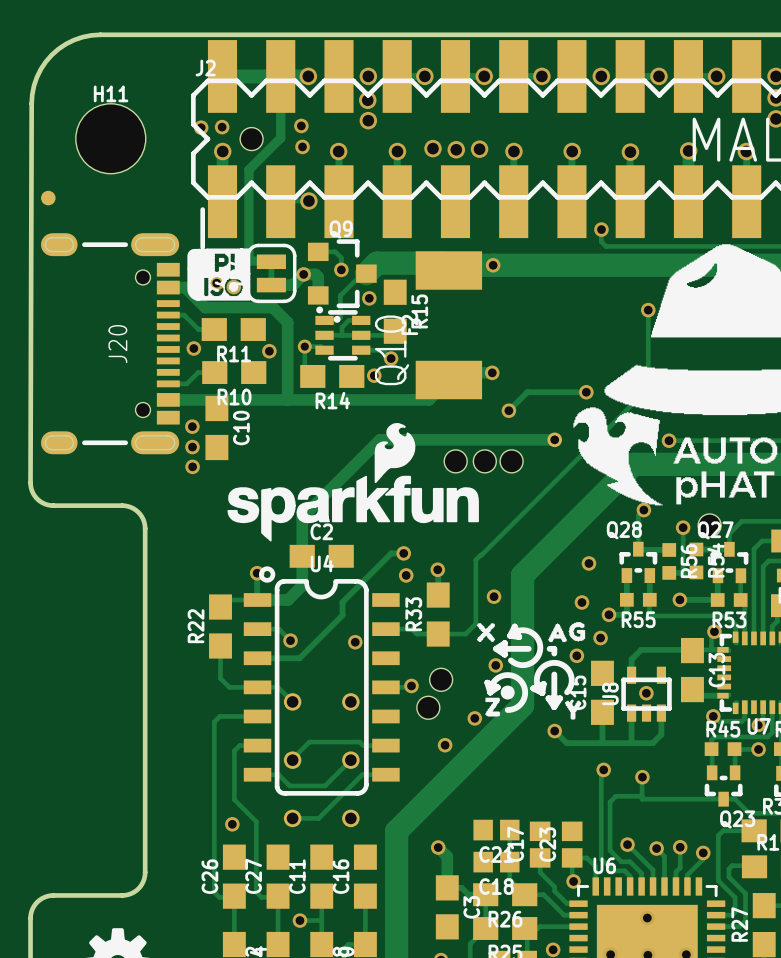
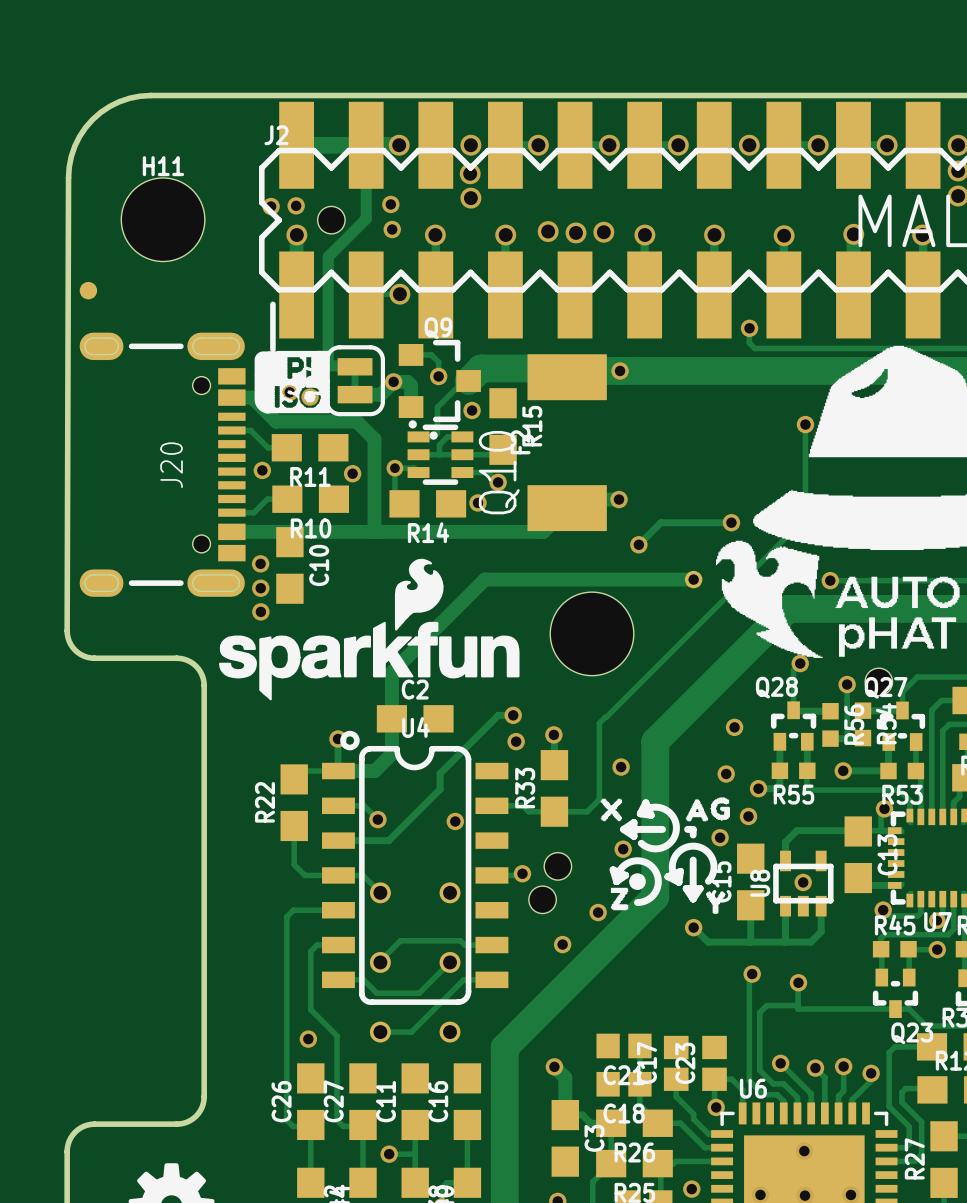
hole: (455, 461) -> none
hole: (484, 461) -> none
hole: (511, 461) -> none
drawing position: (353, 482) -> (369, 629)
hole: none -> (592, 633)

